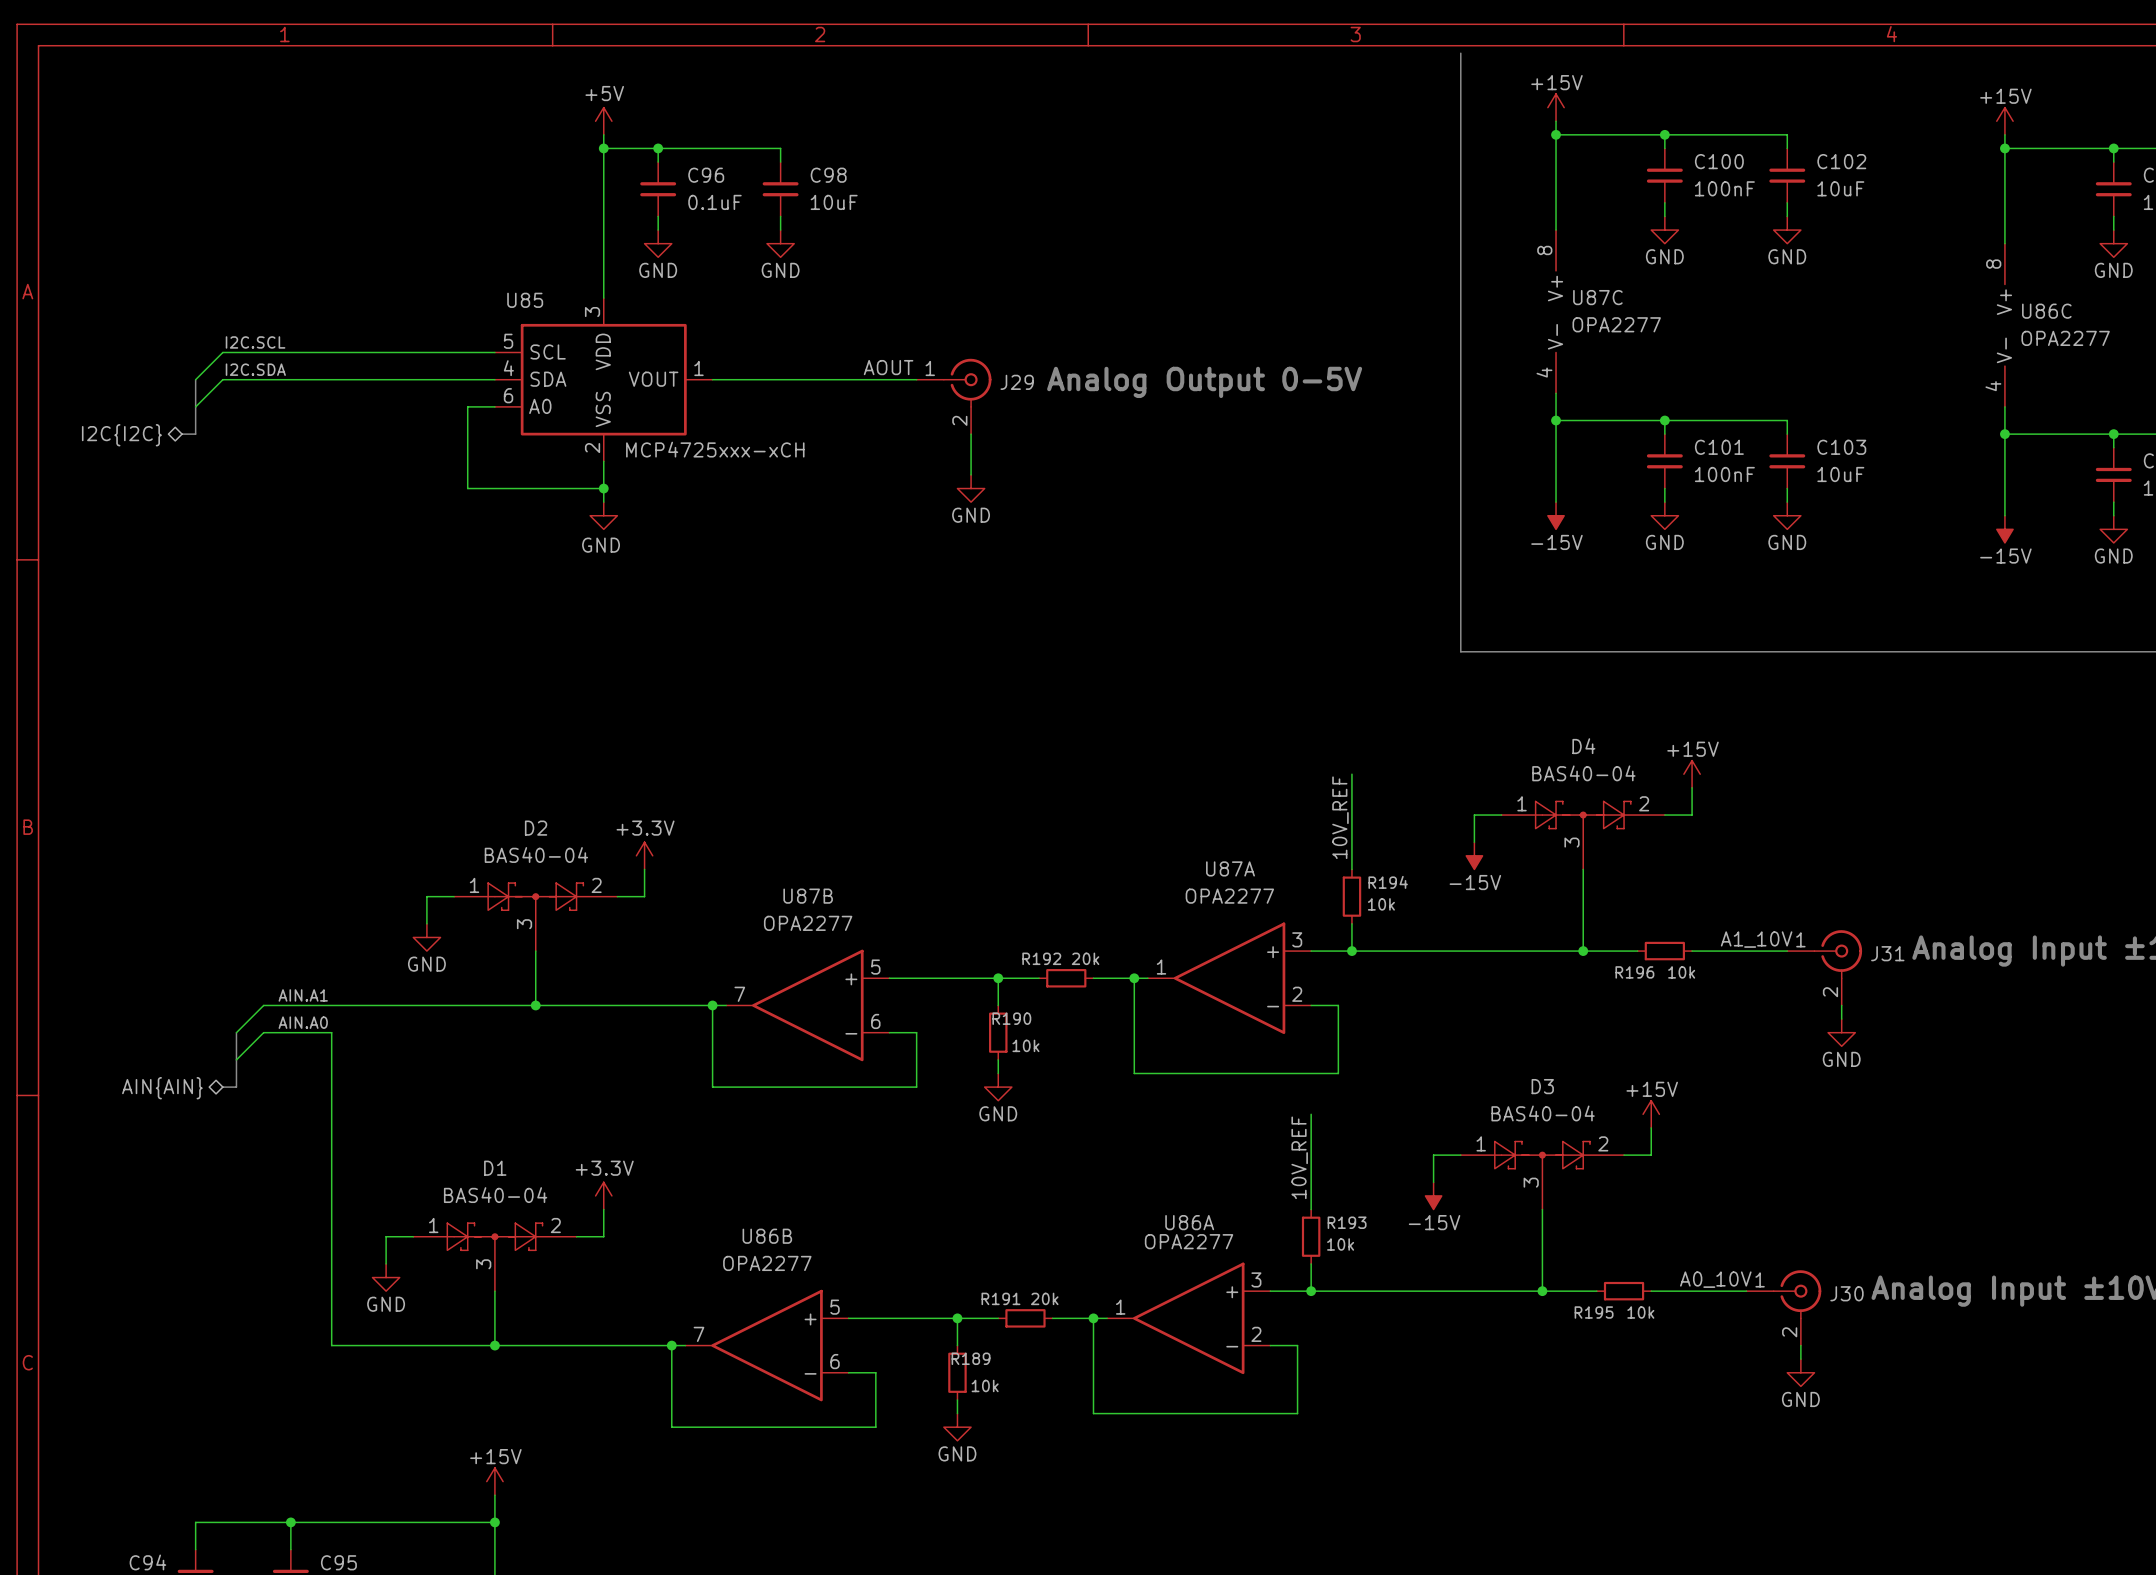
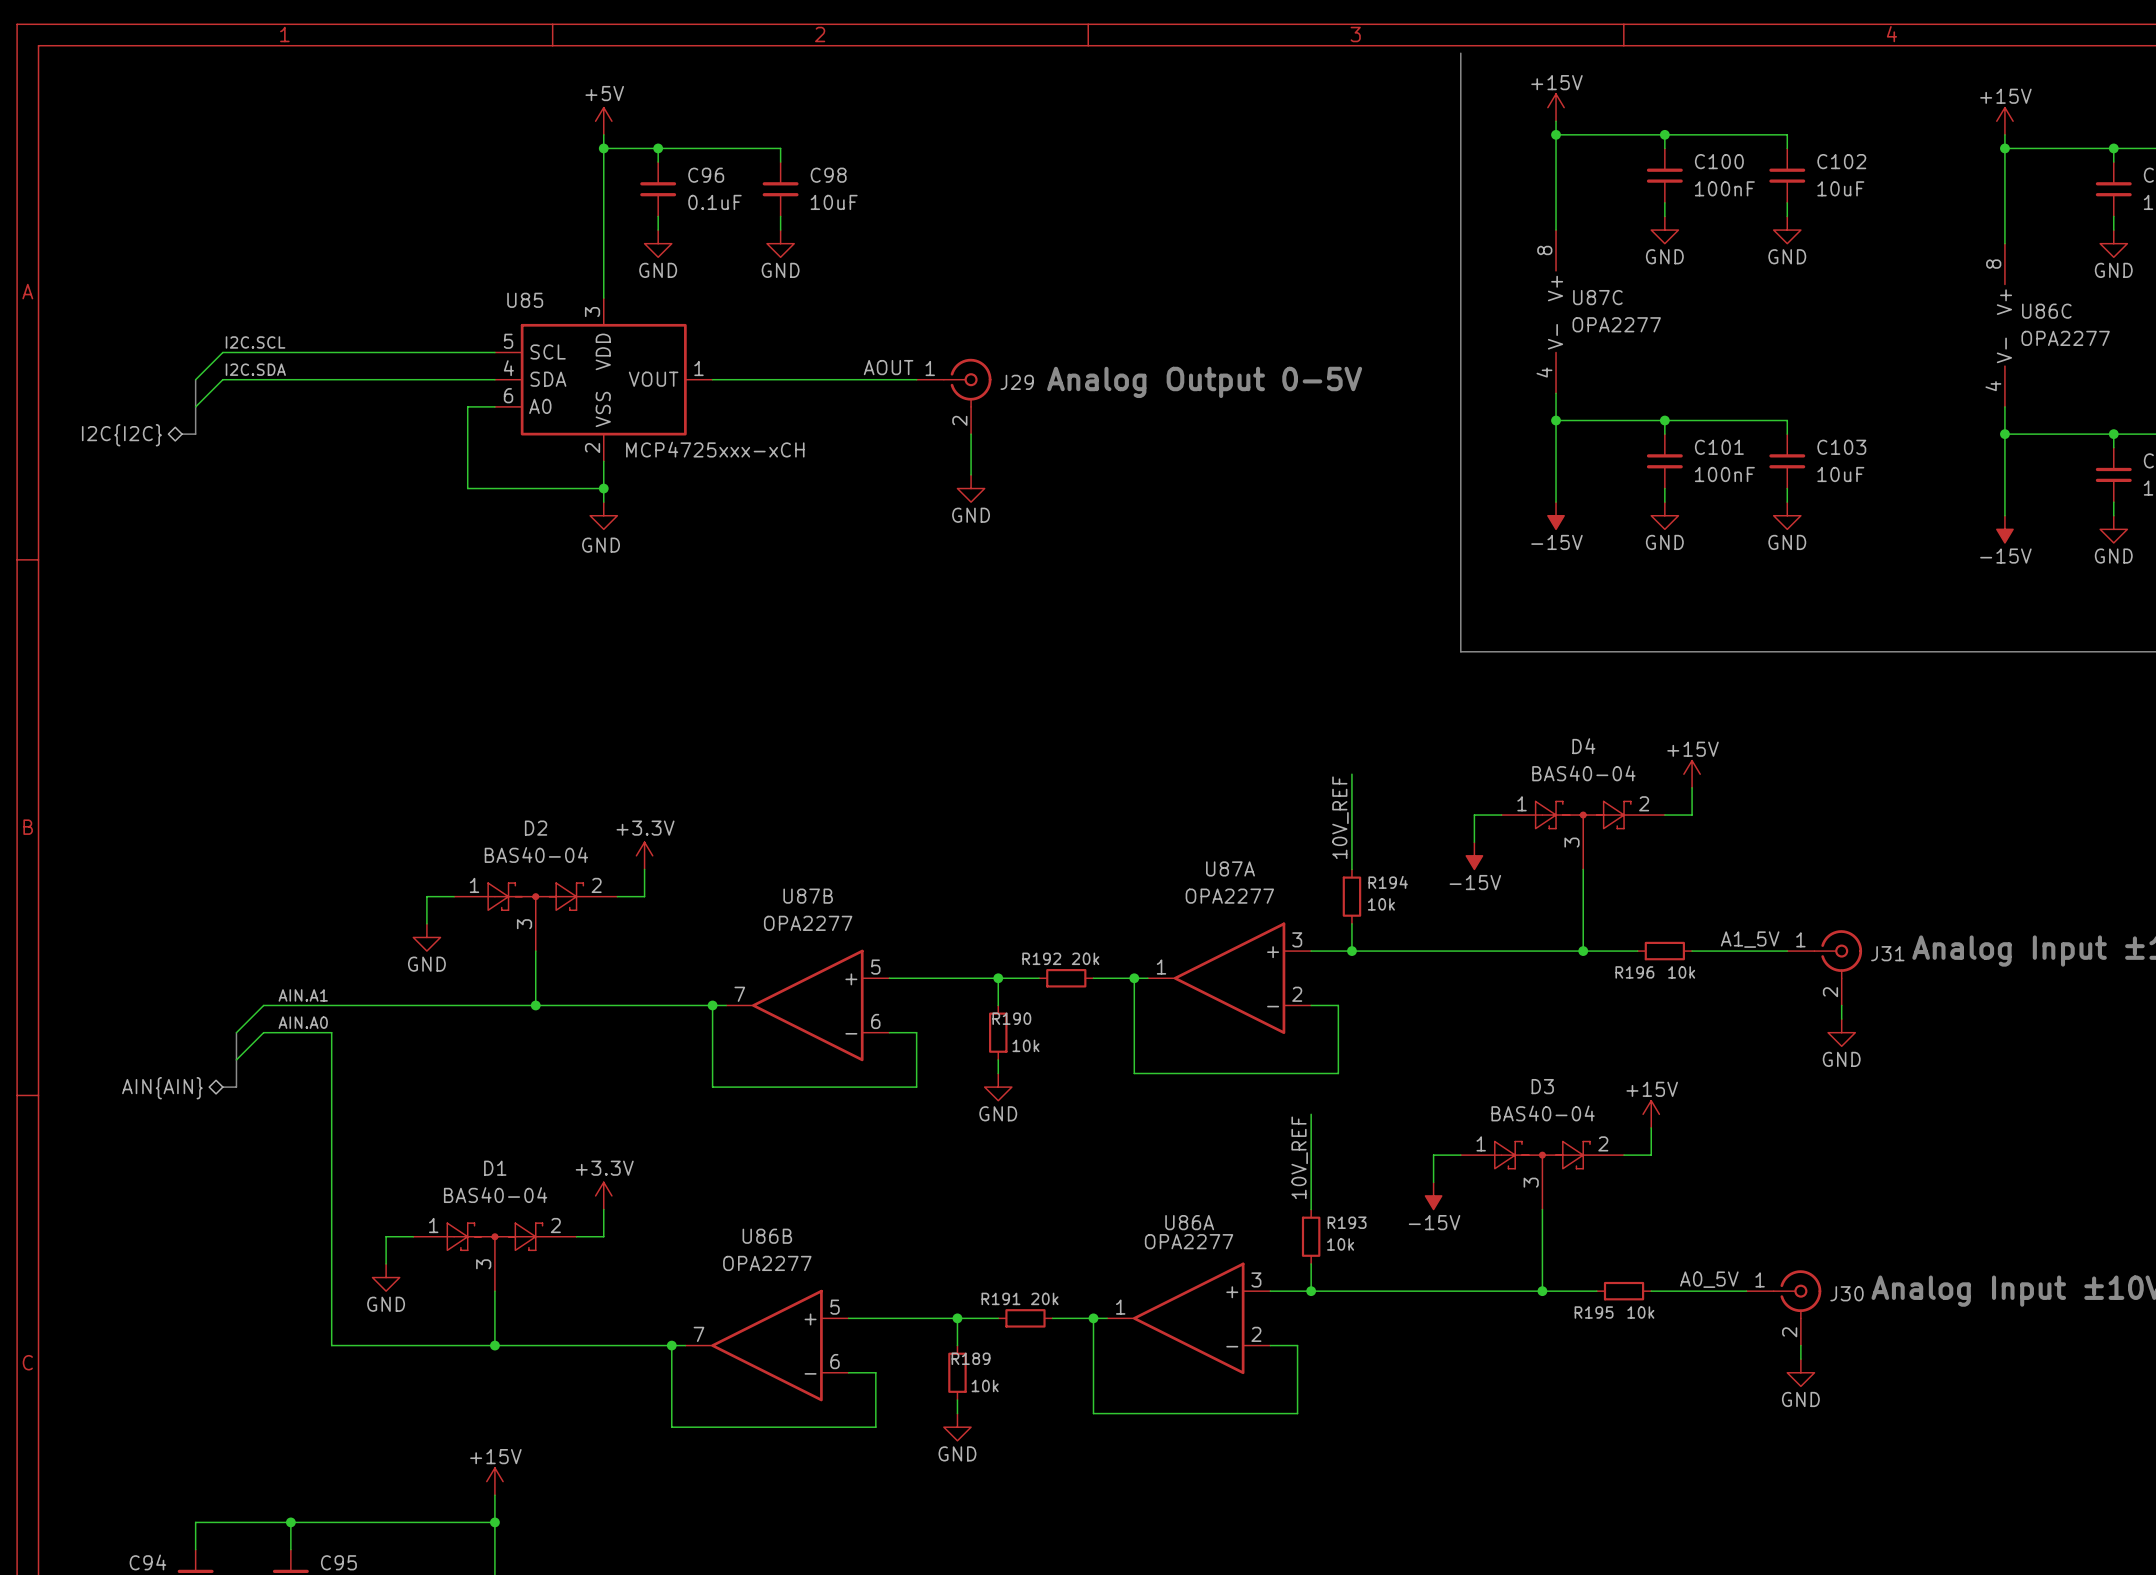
label: A1_10V (1756, 939) -> A1_5V (1750, 939)
label: A0_10V (1715, 1279) -> A0_5V (1709, 1279)

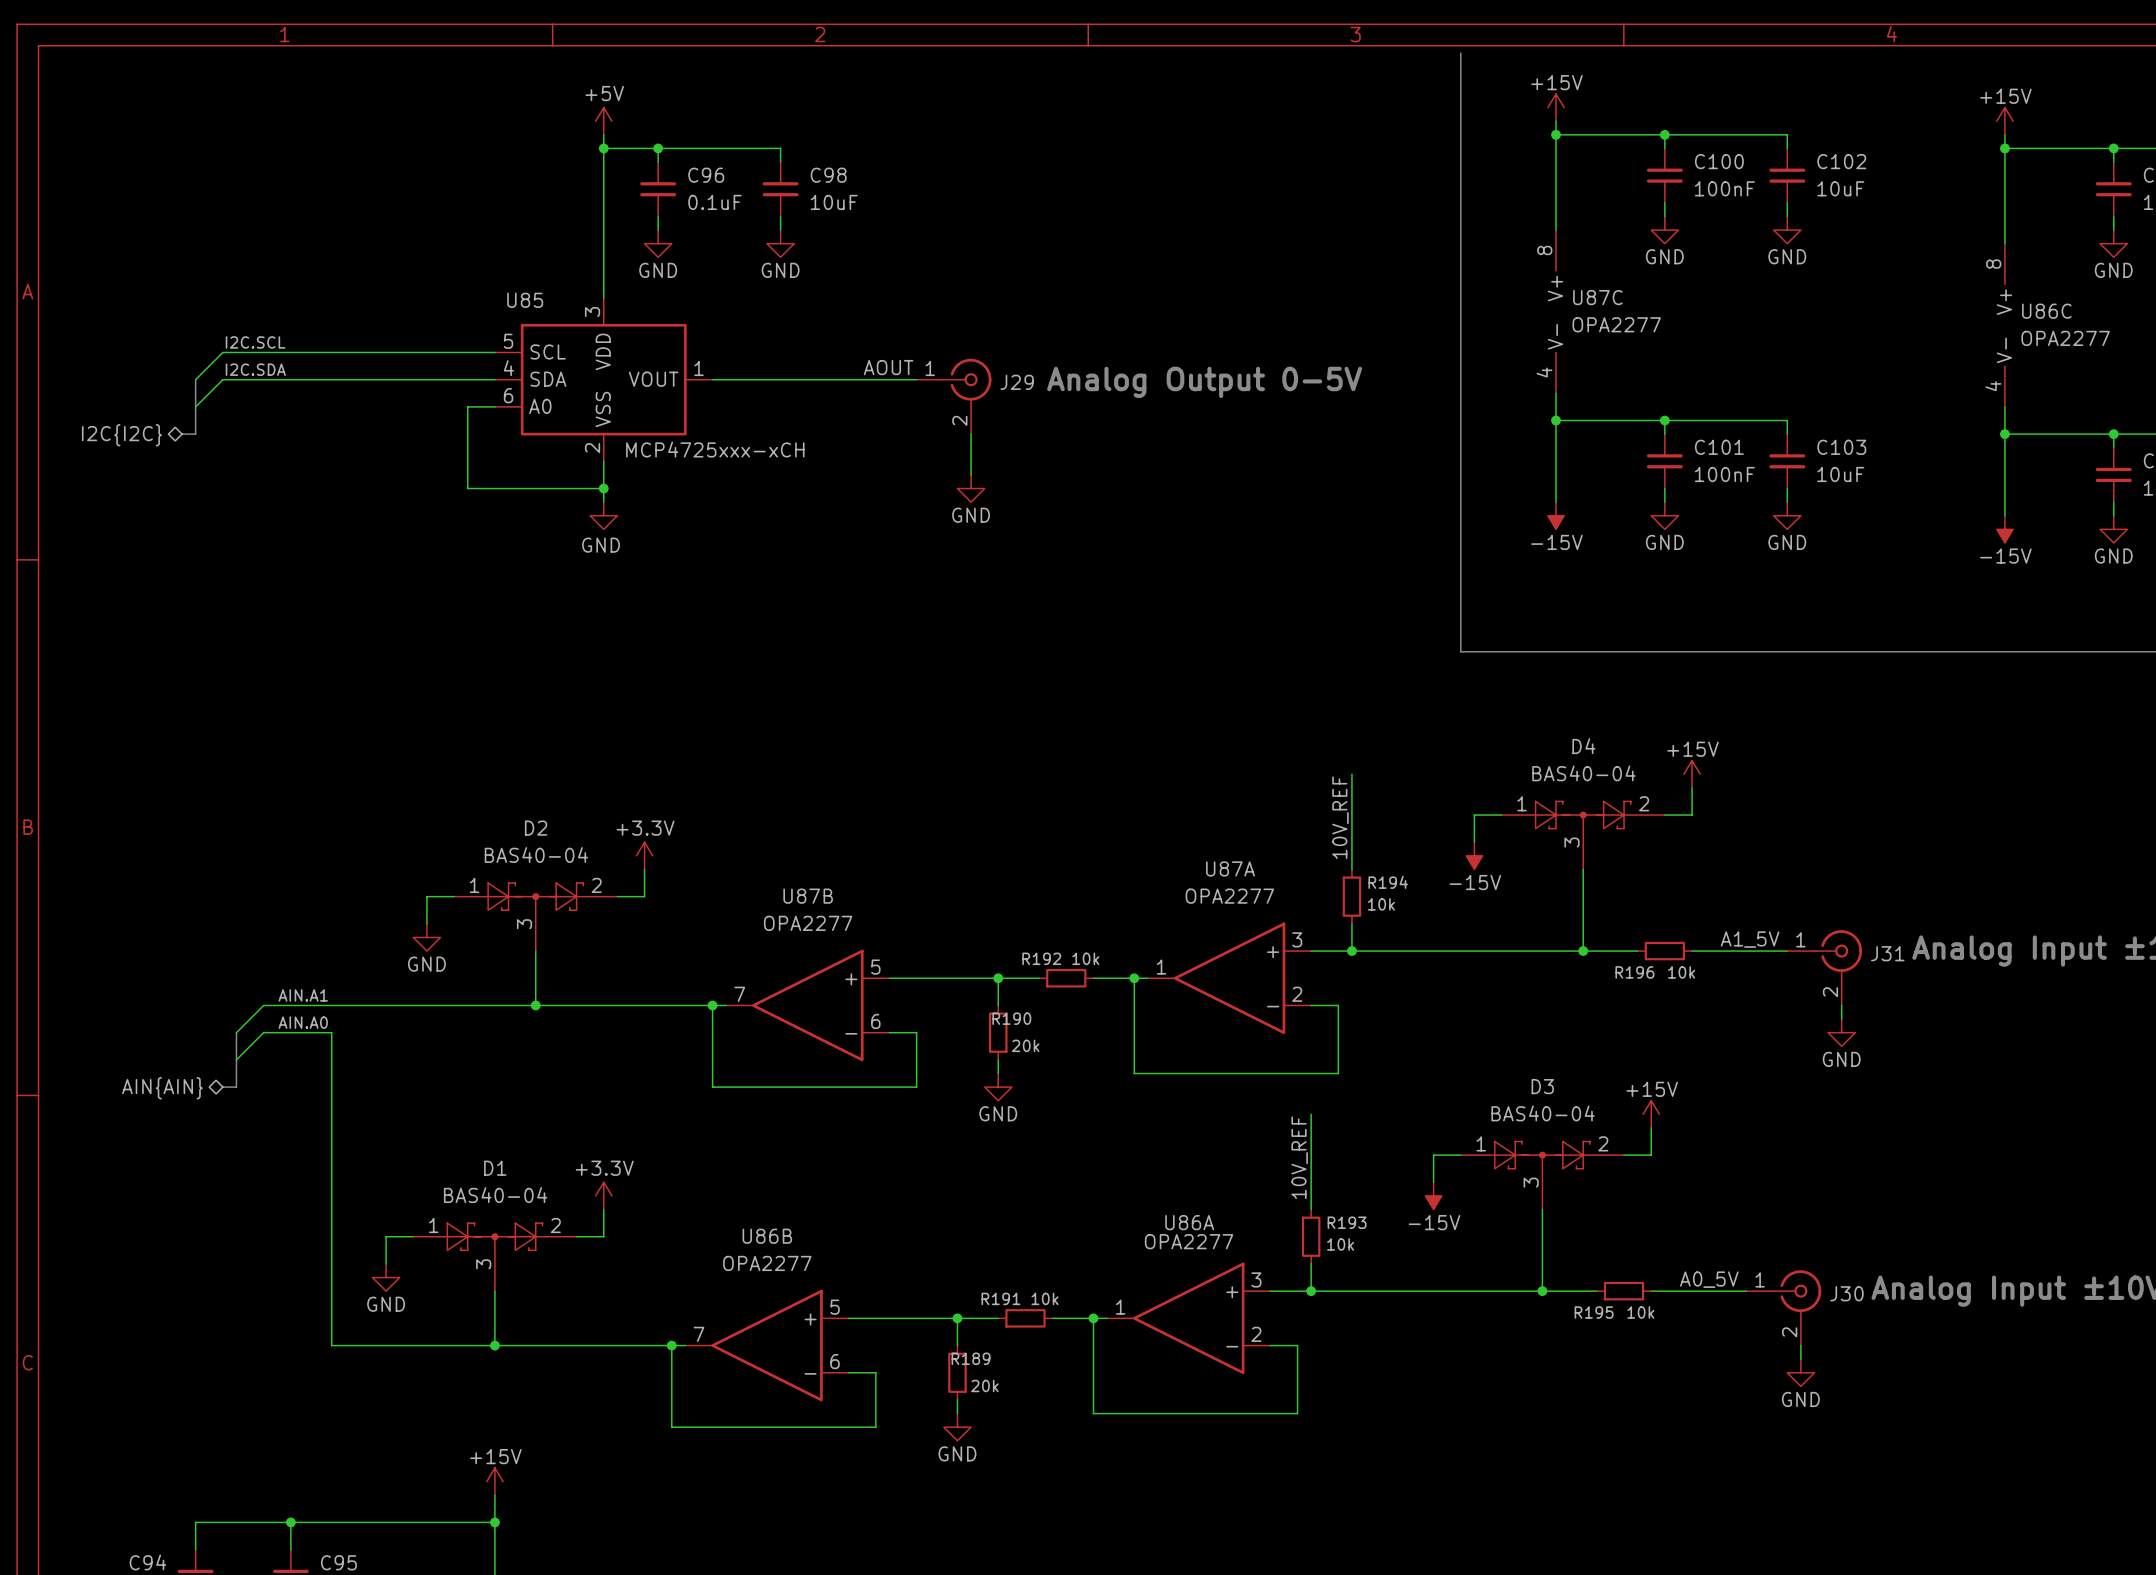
R192 value: 20k (1085, 958) -> 10k (1085, 958)
R190 value: 10k (1025, 1045) -> 20k (1025, 1045)
R191 value: 20k (1044, 1298) -> 10k (1045, 1298)
R189 value: 10k (985, 1385) -> 20k (984, 1385)

